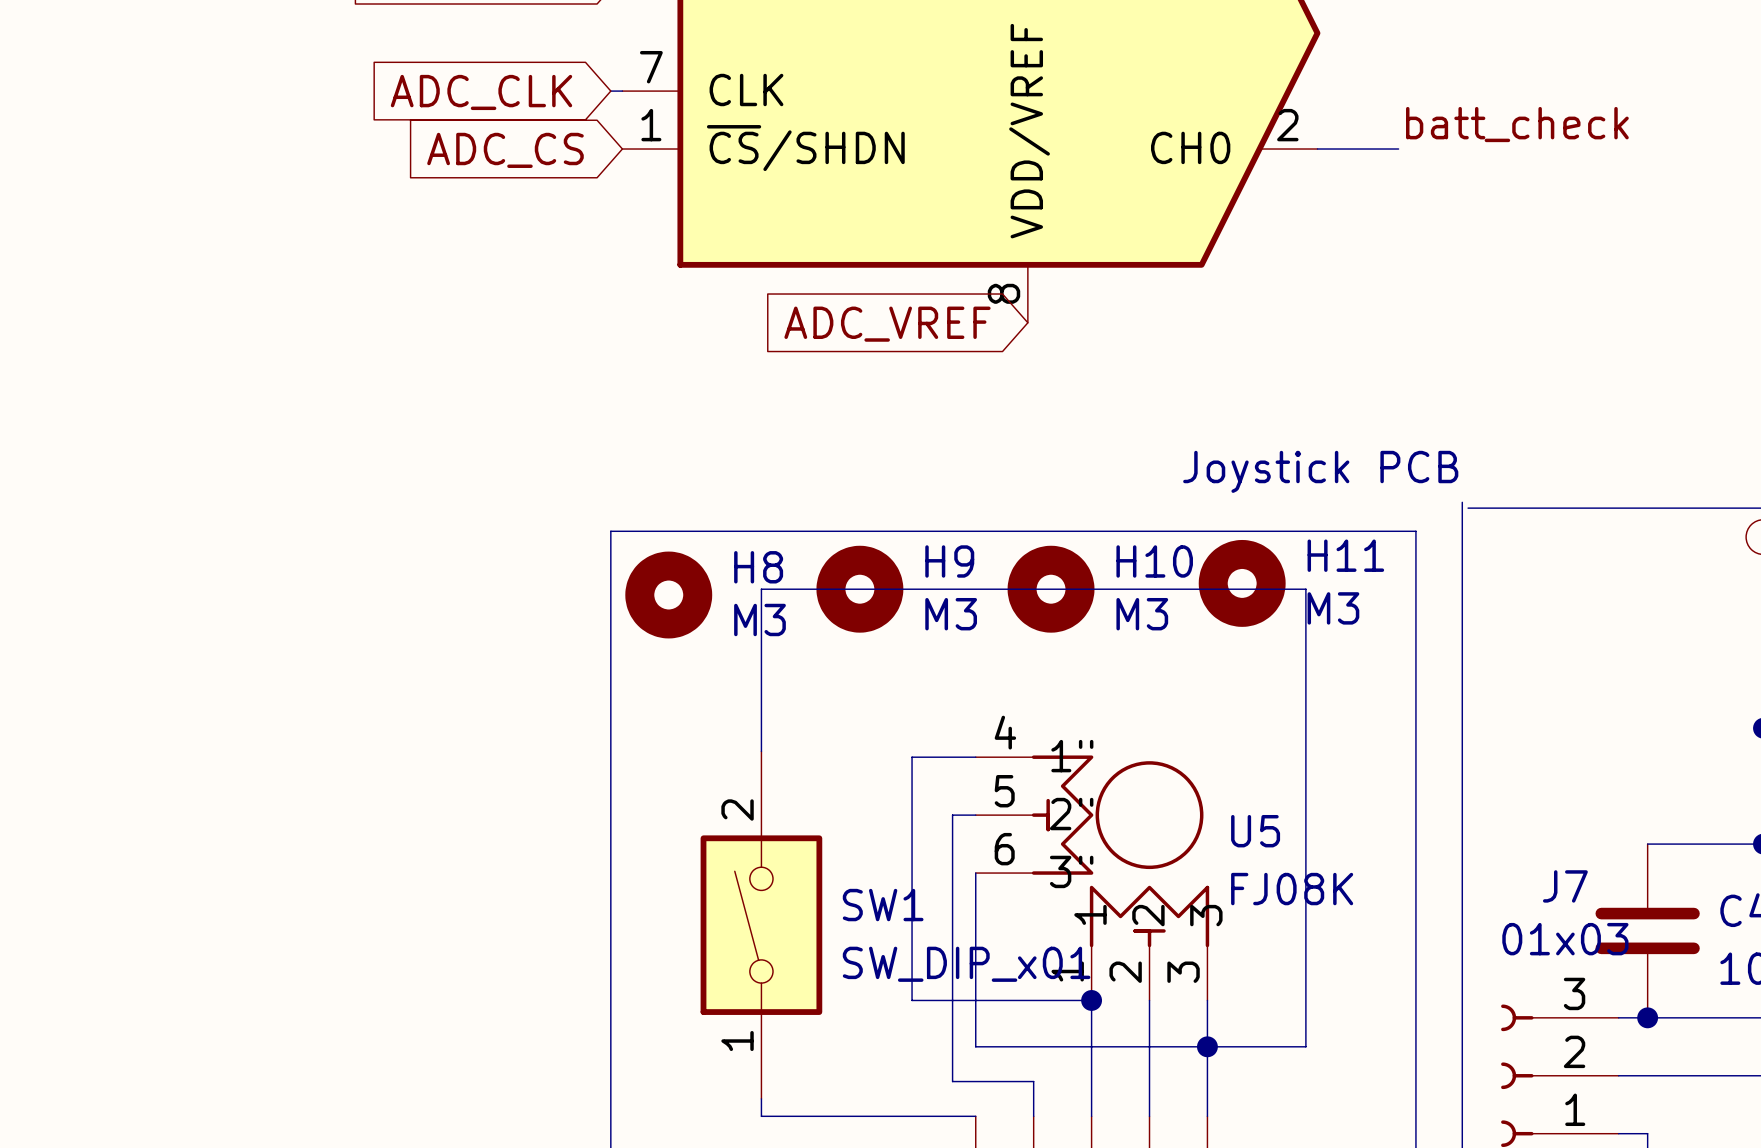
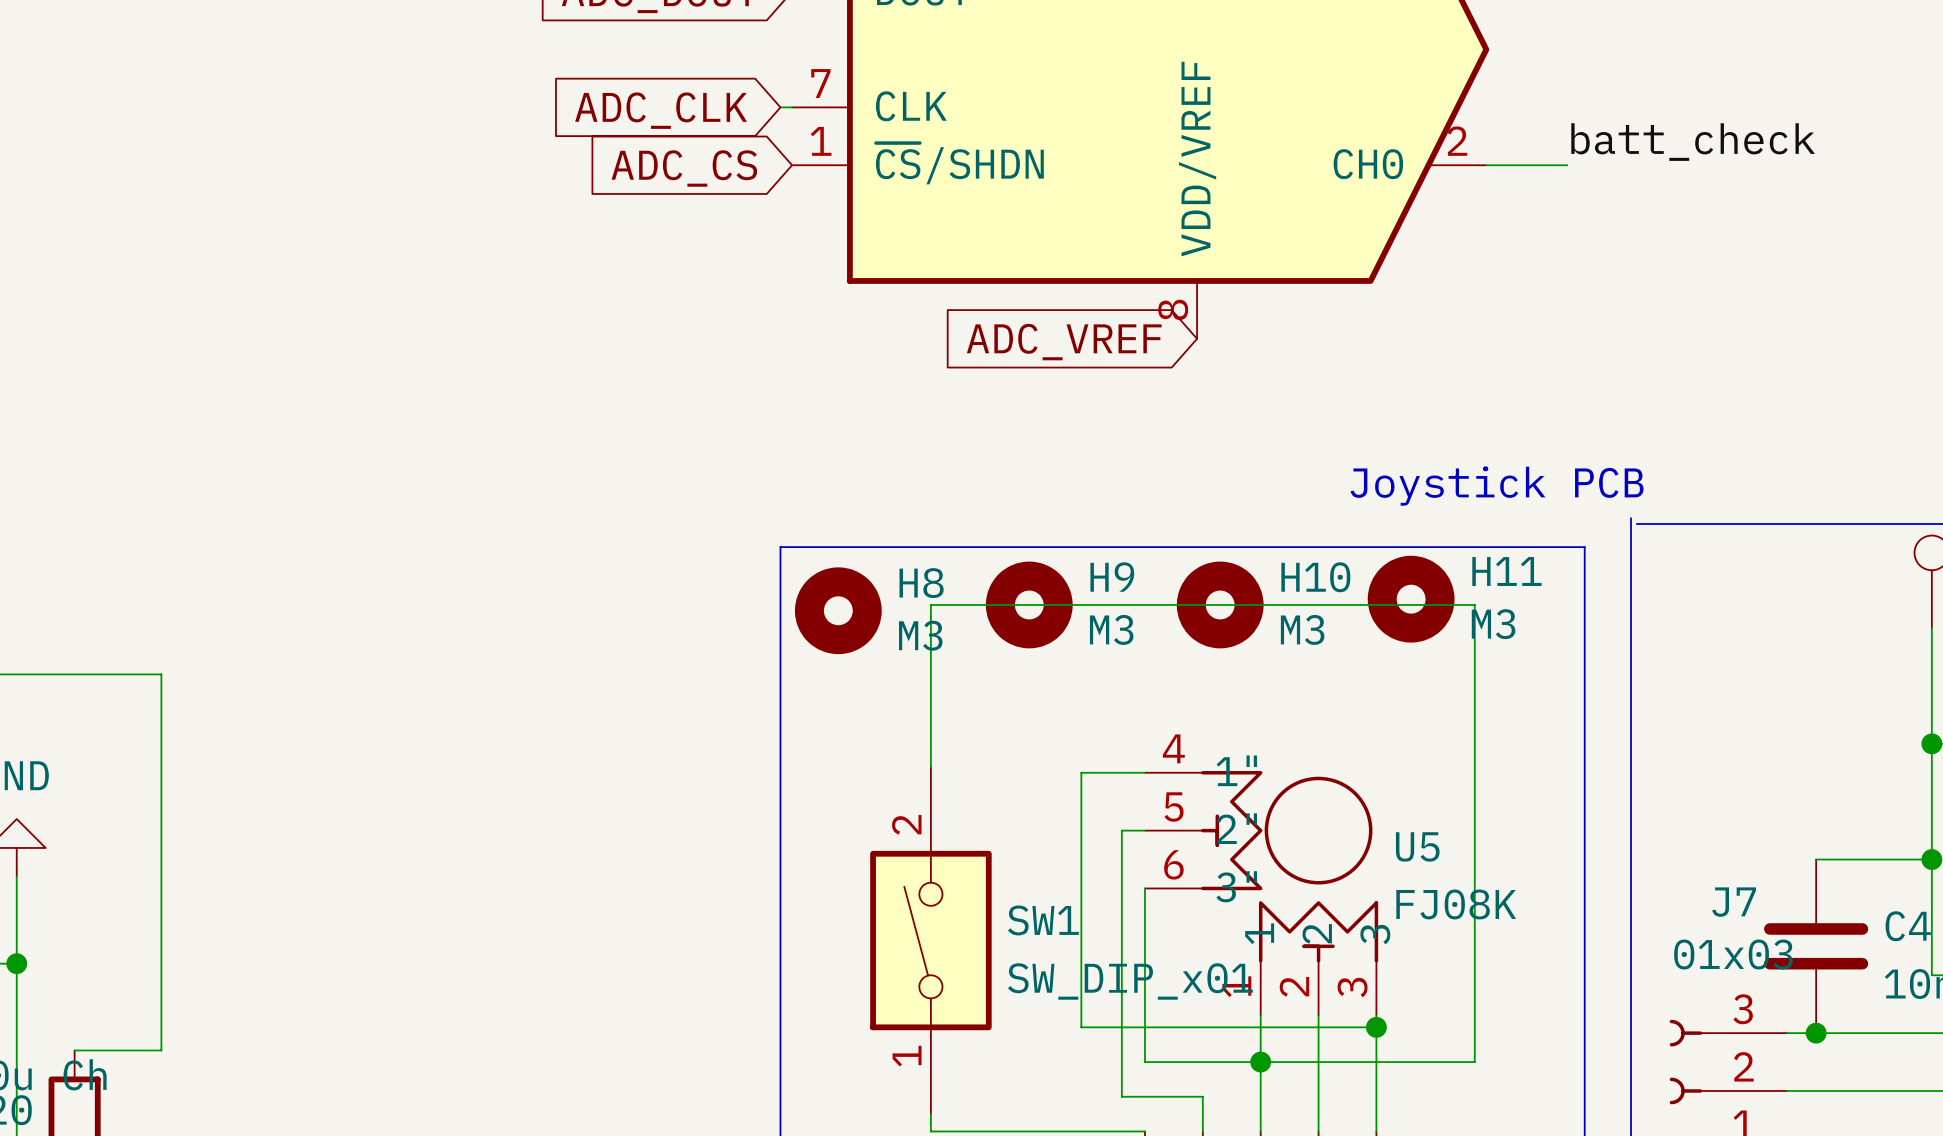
wire: (912, 1000) (1091, 1000) -> (1081, 1015) (1081, 1027) (1376, 1027)
junction position: (1091, 1000) -> (1260, 1062)
junction position: (1207, 1046) -> (1376, 1027)

